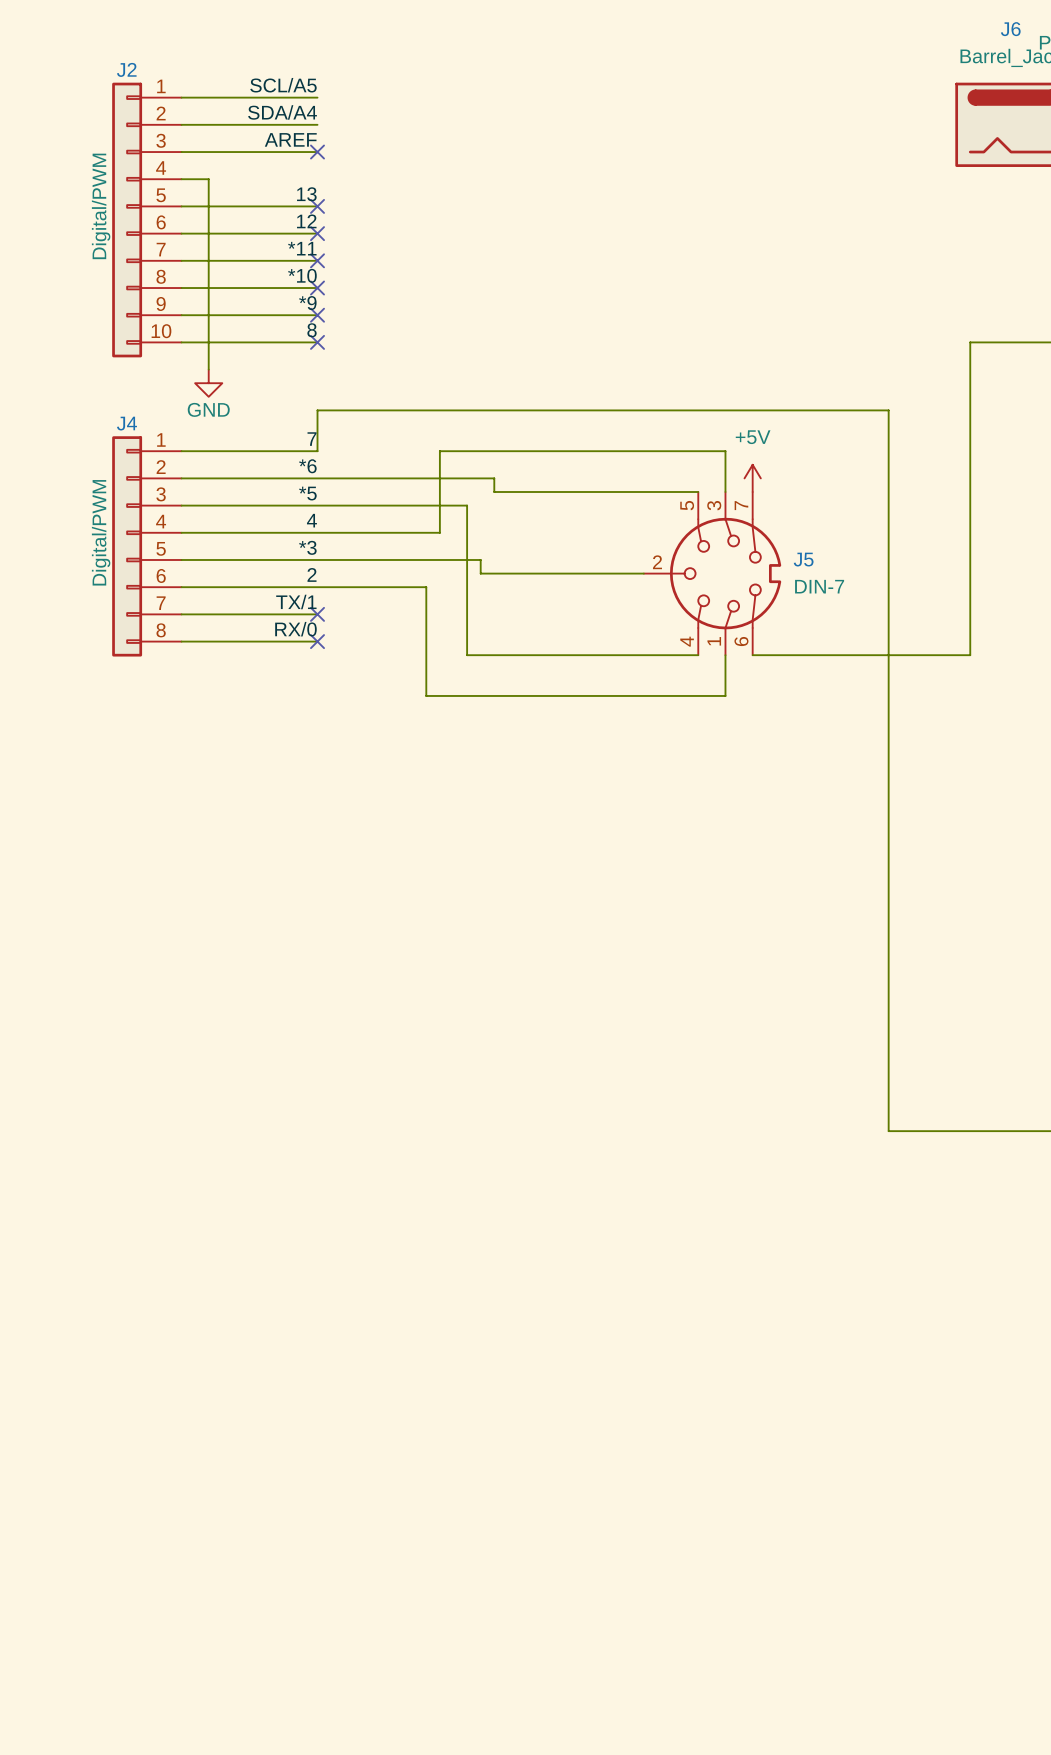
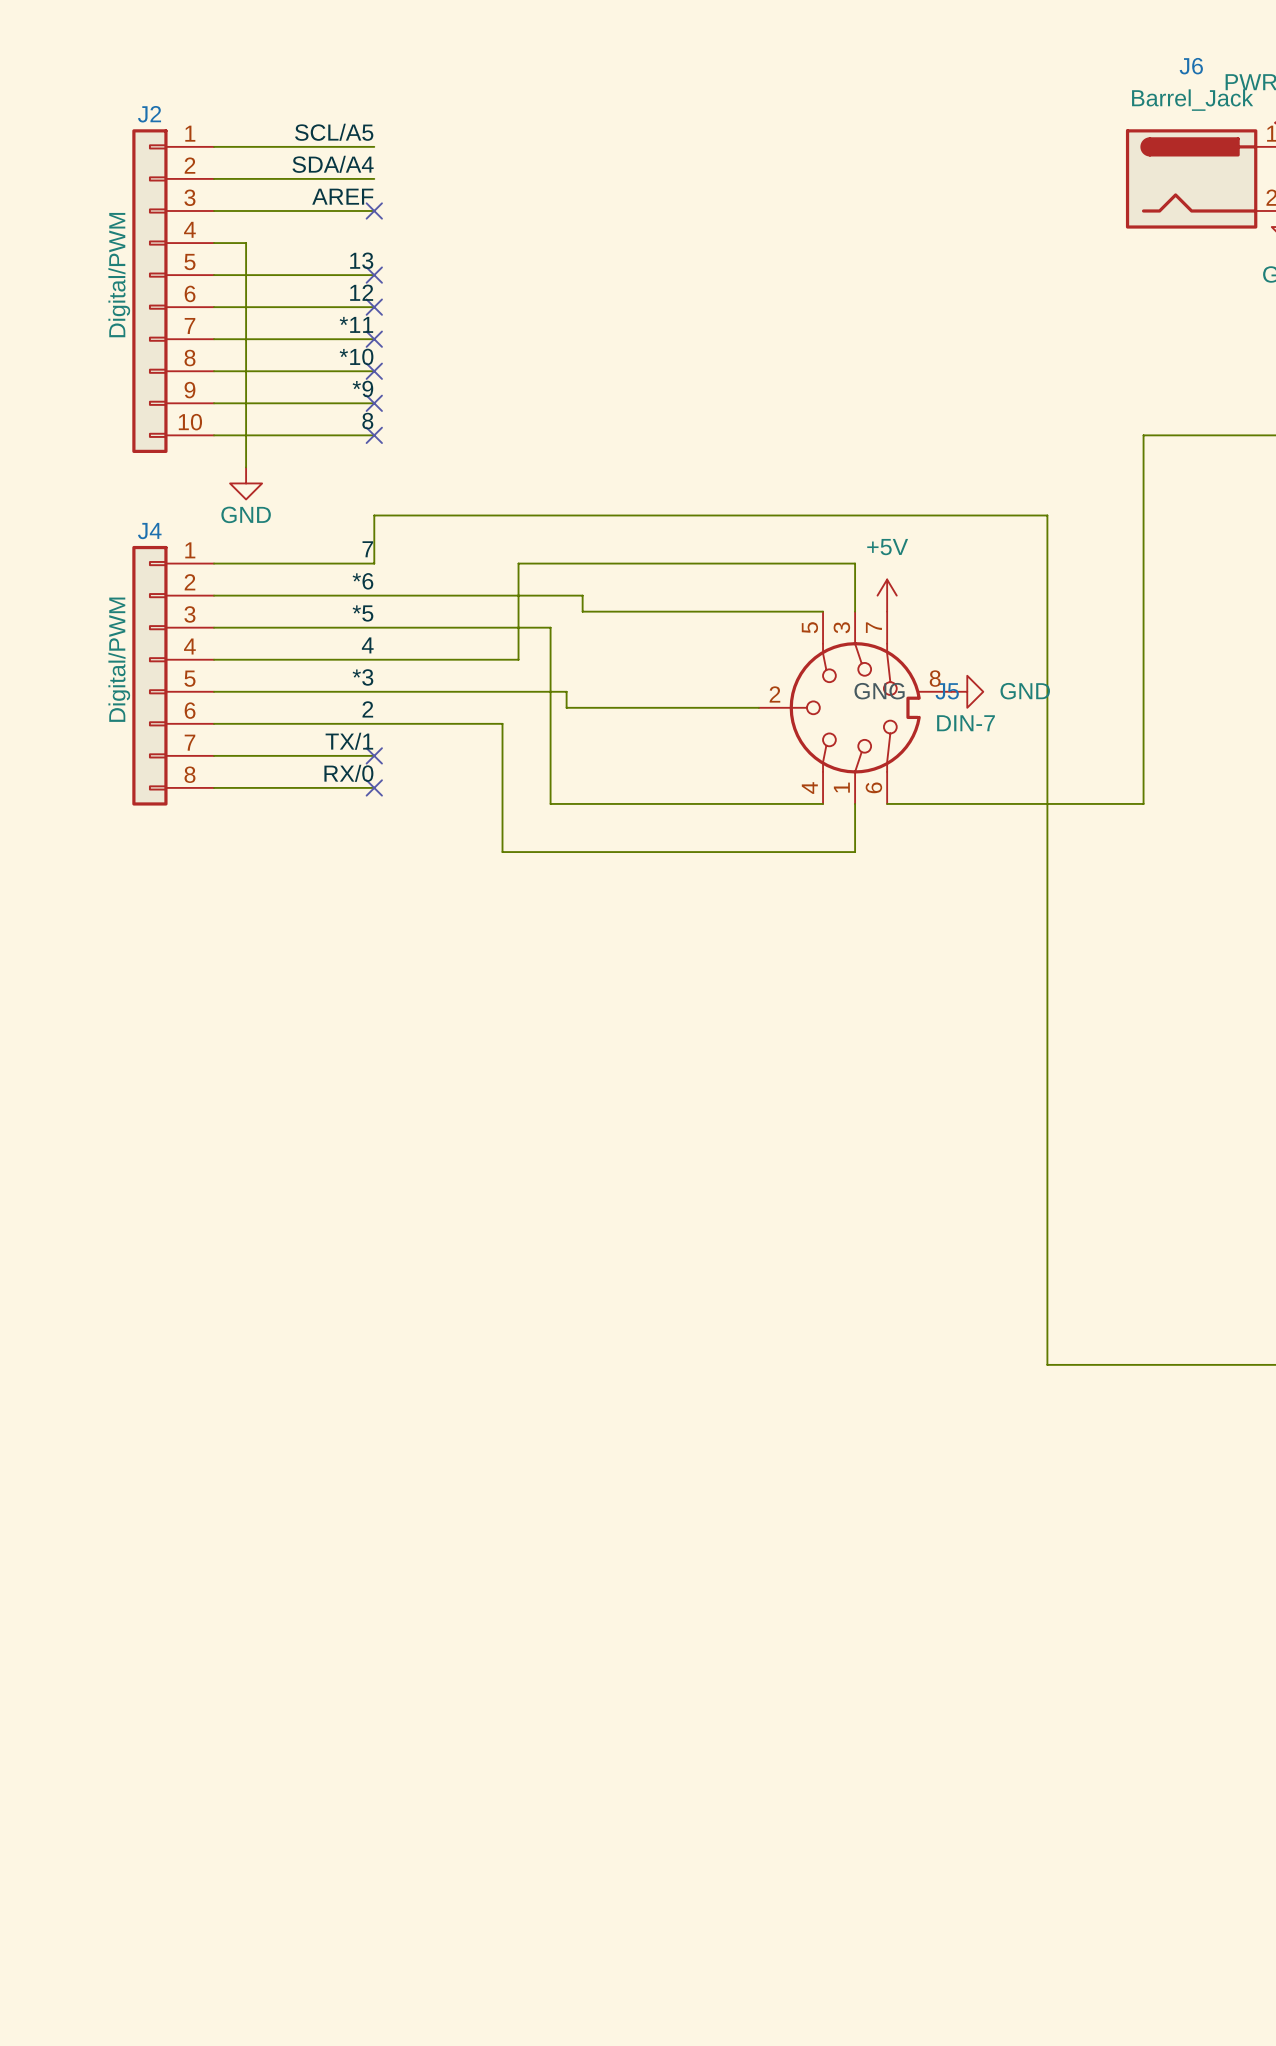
J5 symbol: [643, 492, 782, 656] -> [758, 611, 952, 804]
power symbol: none -> GND (967, 691)

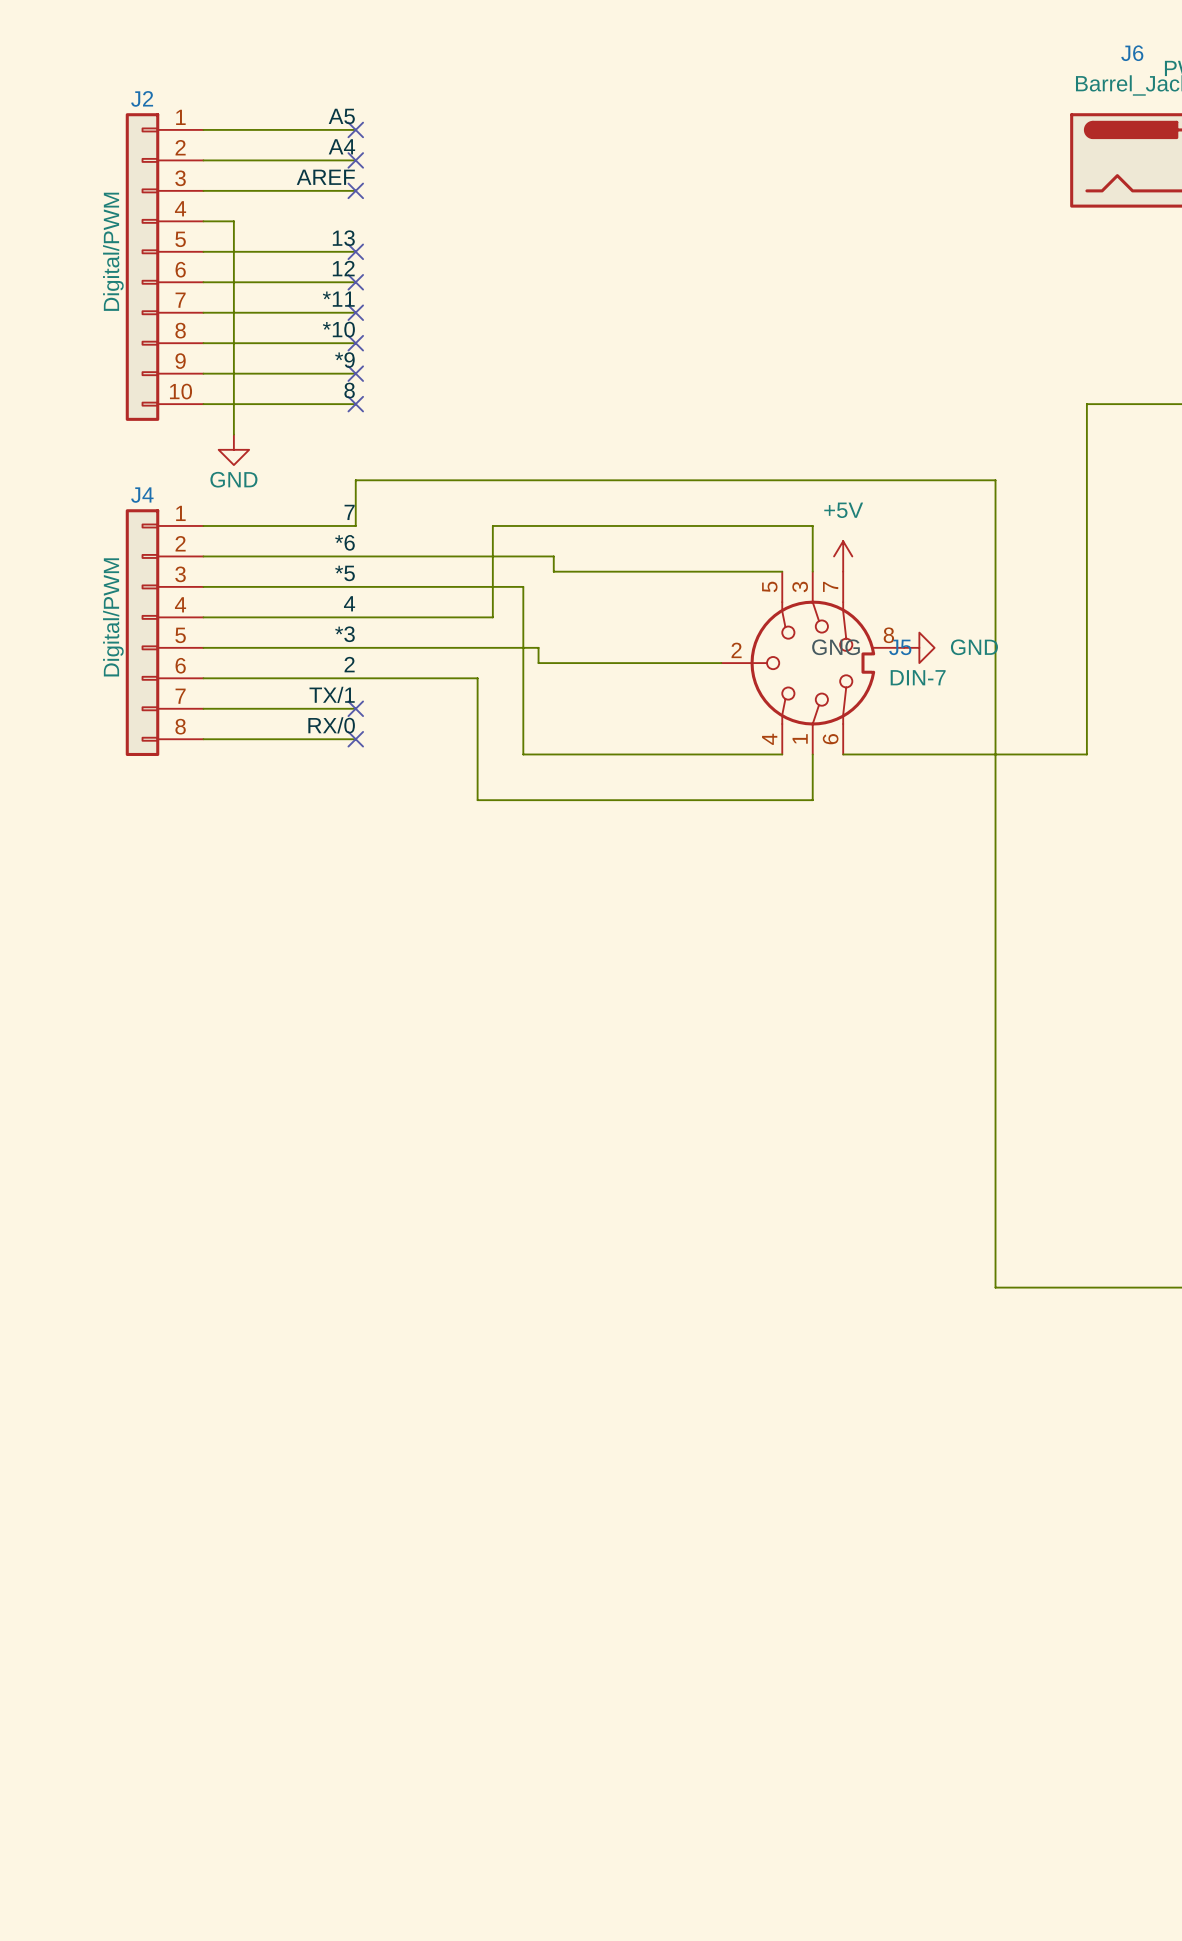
label: SCL/A5 (334, 132) -> A5 (341, 116)
no-connect mark: none -> (355, 129)
label: SDA/A4 (333, 164) -> A4 (341, 146)
no-connect mark: none -> (355, 160)

